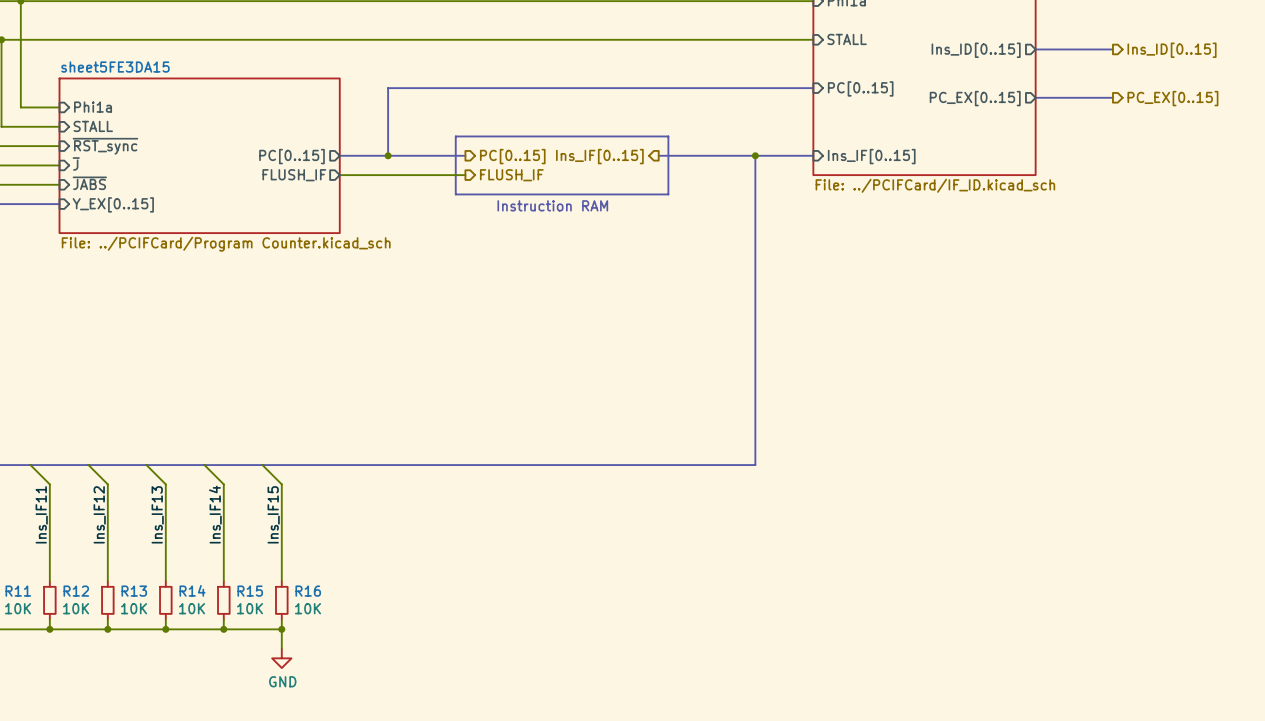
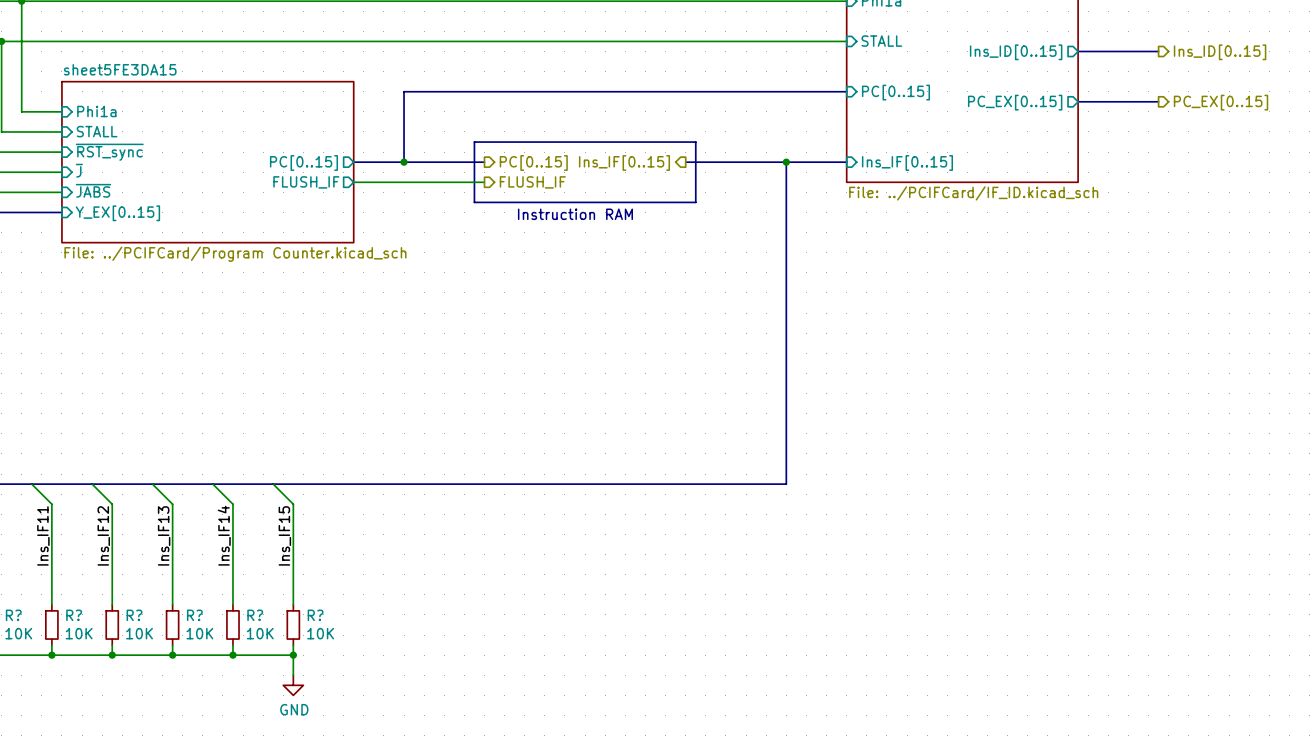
R14 name: R14 (192, 590) -> R? (194, 615)
R11 name: R11 (18, 591) -> R? (13, 615)
R12 name: R12 (76, 591) -> R? (74, 615)
R13 name: R13 (134, 591) -> R? (134, 615)
R15 name: R15 (250, 591) -> R? (255, 615)
R16 name: R16 (308, 591) -> R? (315, 615)

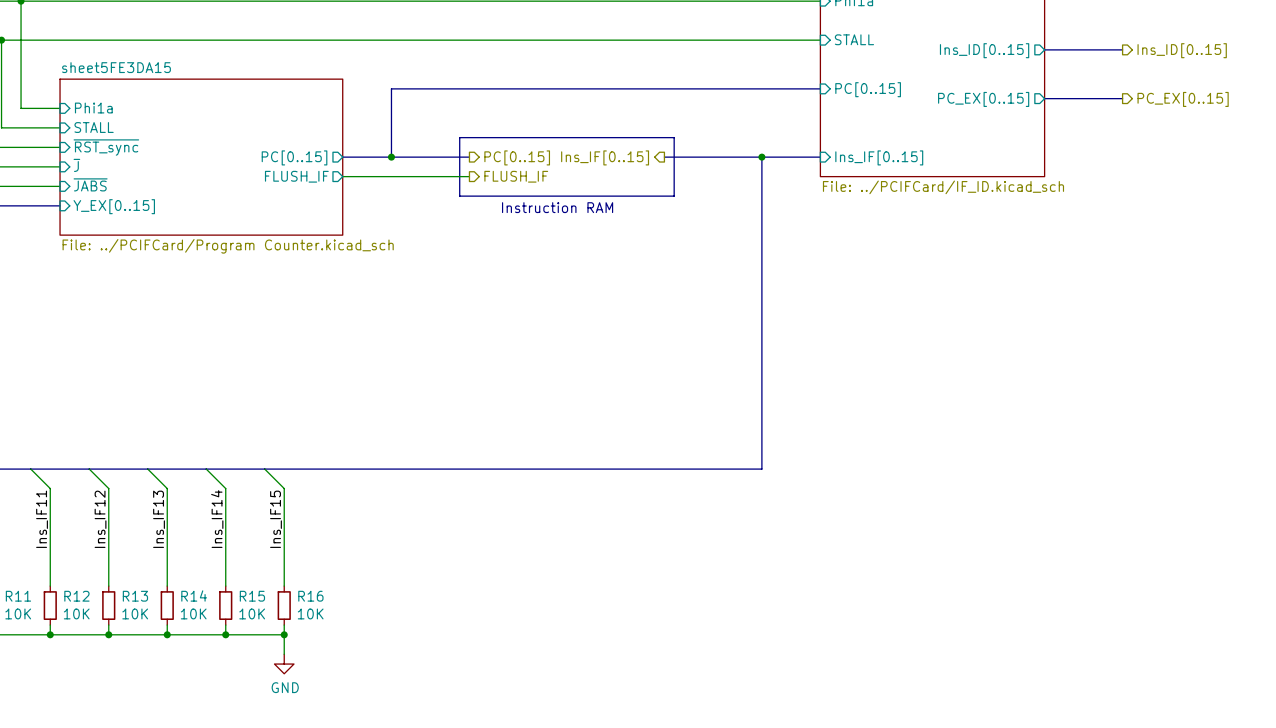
R? name: R? (13, 615) -> R11 (18, 596)
R? name: R? (74, 615) -> R12 (76, 596)
R? name: R? (134, 615) -> R13 (135, 596)
R? name: R? (194, 615) -> R14 (194, 595)
R? name: R? (255, 615) -> R15 (252, 596)
R? name: R? (315, 615) -> R16 (310, 596)

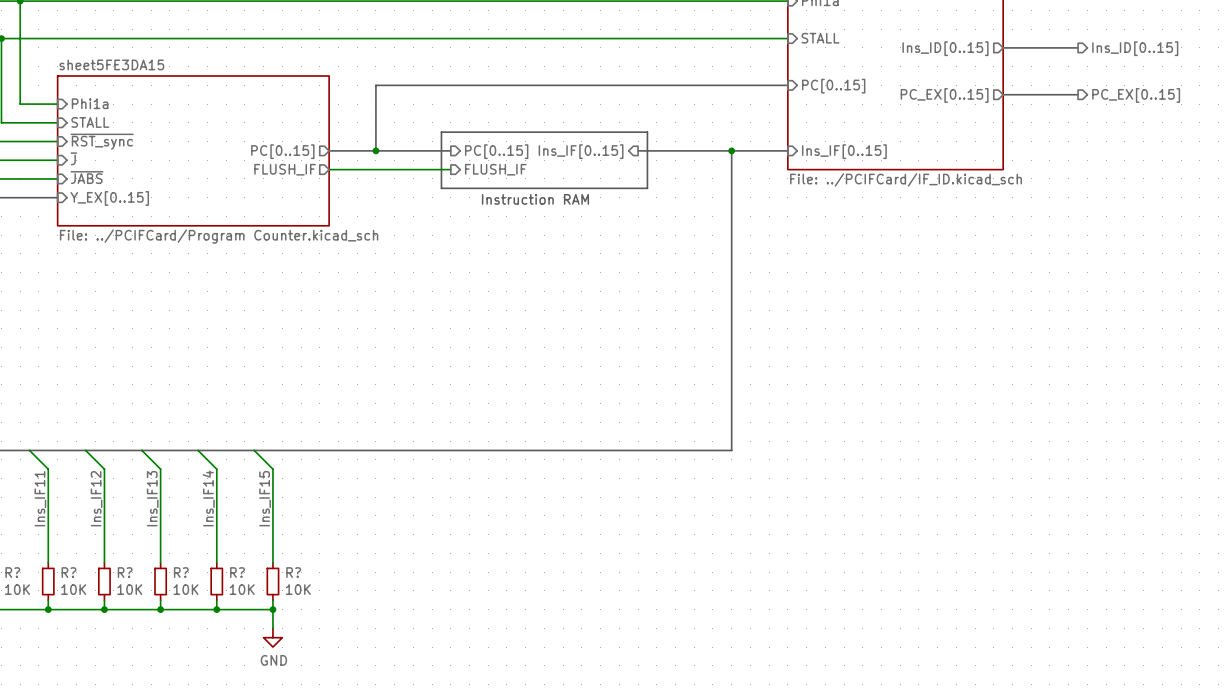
R14 name: R14 (194, 595) -> R? (181, 572)
R11 name: R11 (18, 596) -> R? (12, 572)
R12 name: R12 (76, 596) -> R? (68, 572)
R13 name: R13 (135, 596) -> R? (125, 572)
R15 name: R15 (252, 596) -> R? (237, 572)
R16 name: R16 (310, 596) -> R? (293, 572)

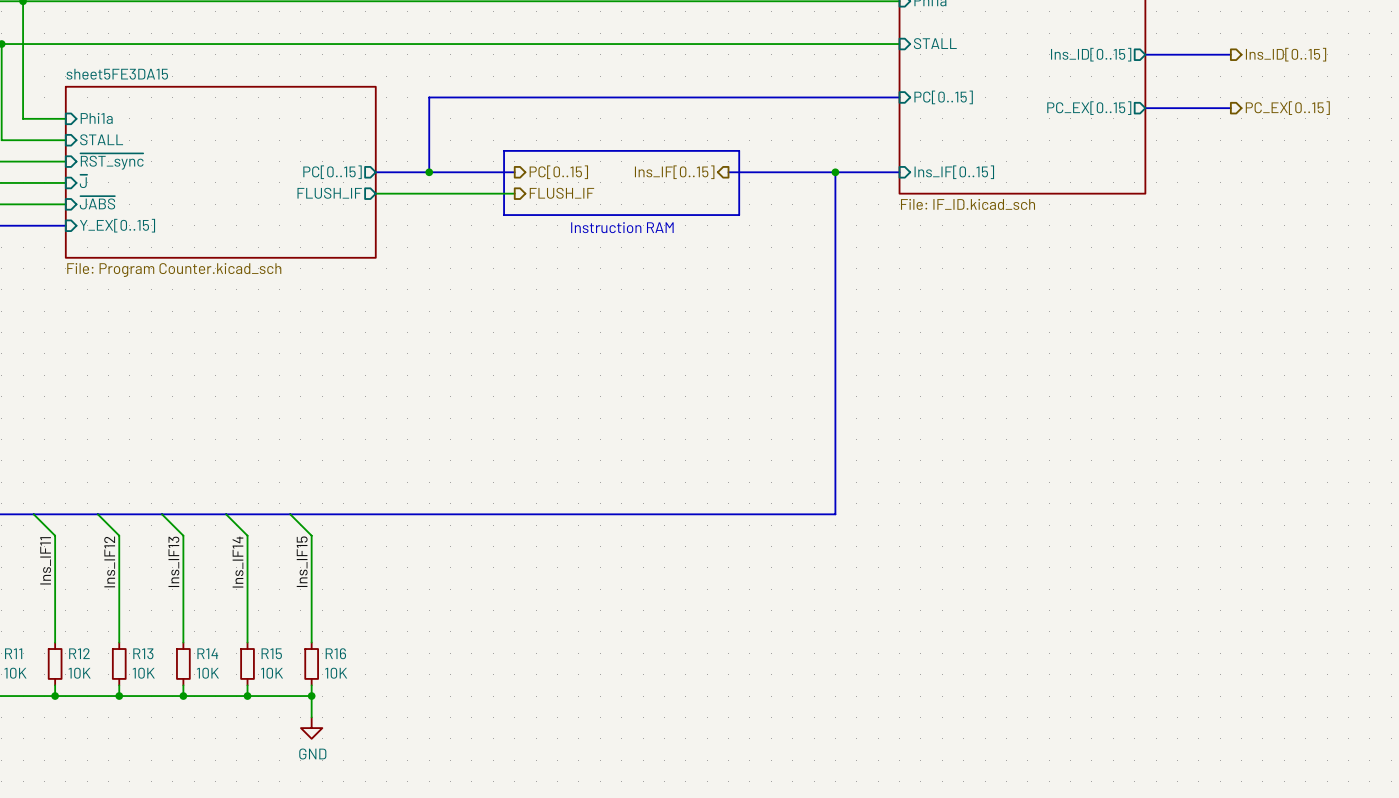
sheet value: File: ../PCIFCard/IF_ID.kicad_sch (906, 179) -> File: IF_ID.kicad_sch (968, 204)
sheet sheet5FE3DA15 value: File: ../PCIFCard/Program Counter.kicad_sch (219, 236) -> File: Program Counter.kicad_sch (174, 270)
R? name: R? (12, 572) -> R11 (13, 653)
R? name: R? (68, 572) -> R12 (79, 653)
R? name: R? (125, 572) -> R13 (143, 653)
R? name: R? (181, 572) -> R14 (207, 653)
R? name: R? (237, 572) -> R15 (271, 653)
R? name: R? (293, 572) -> R16 (335, 653)

